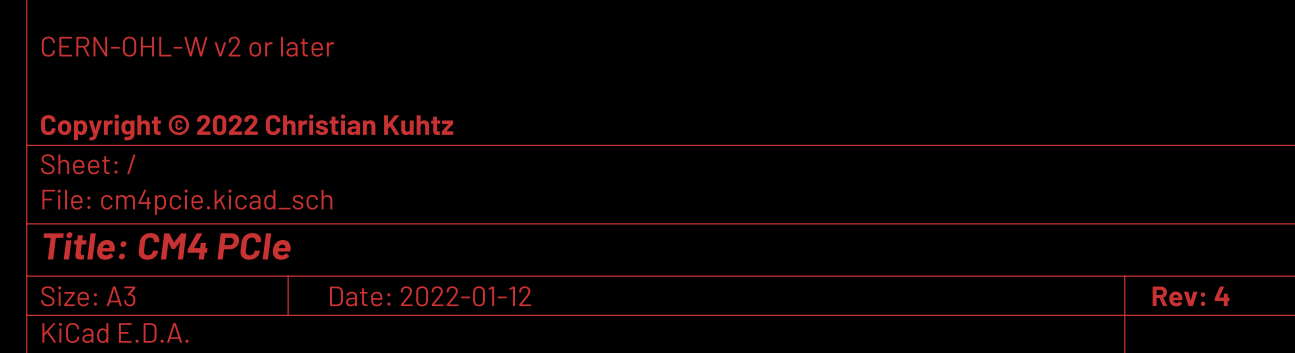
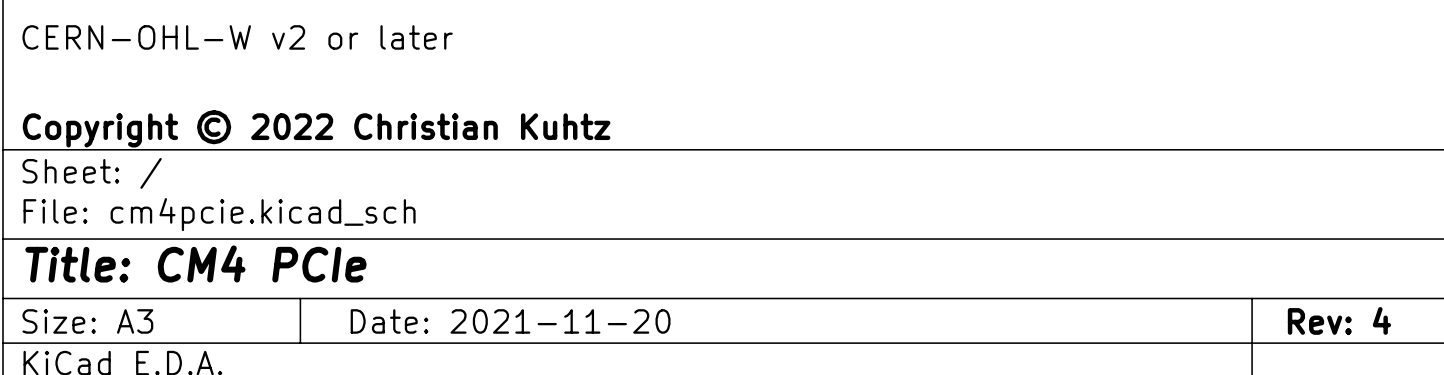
title block: Date: 2022-01-12 (430, 296) -> Date: 2021-11-20 (510, 321)

